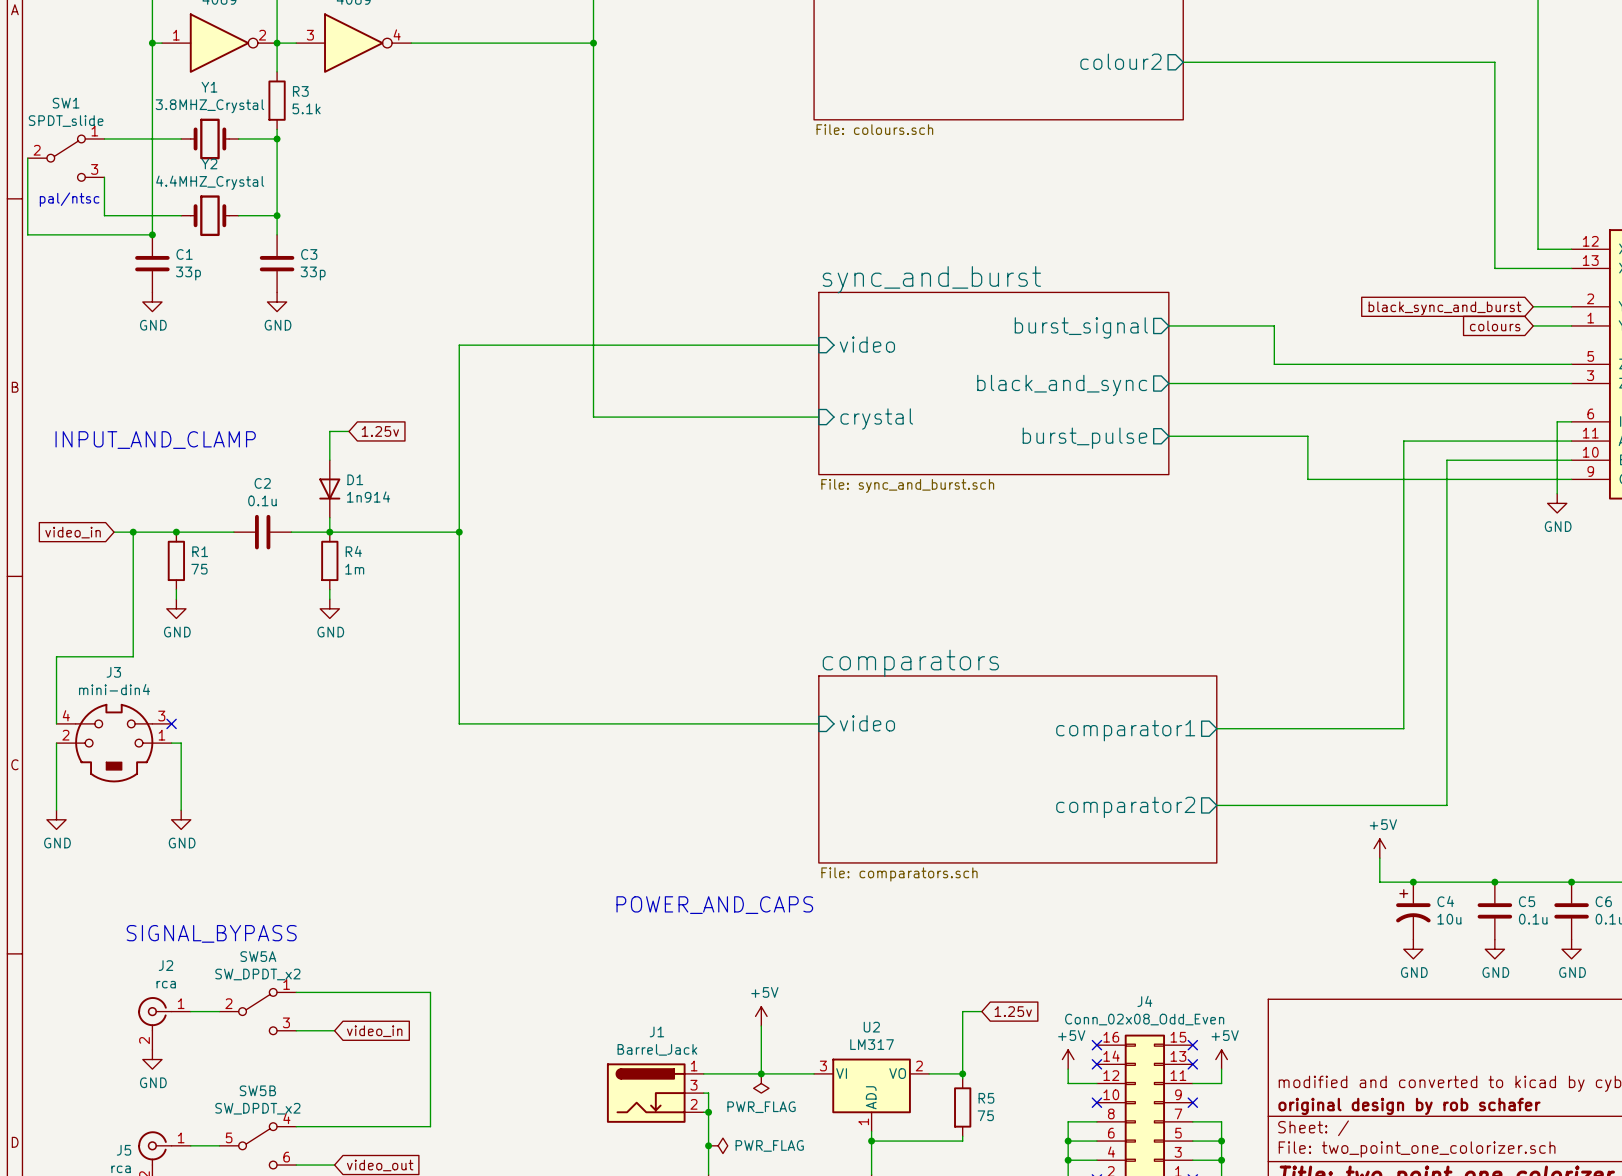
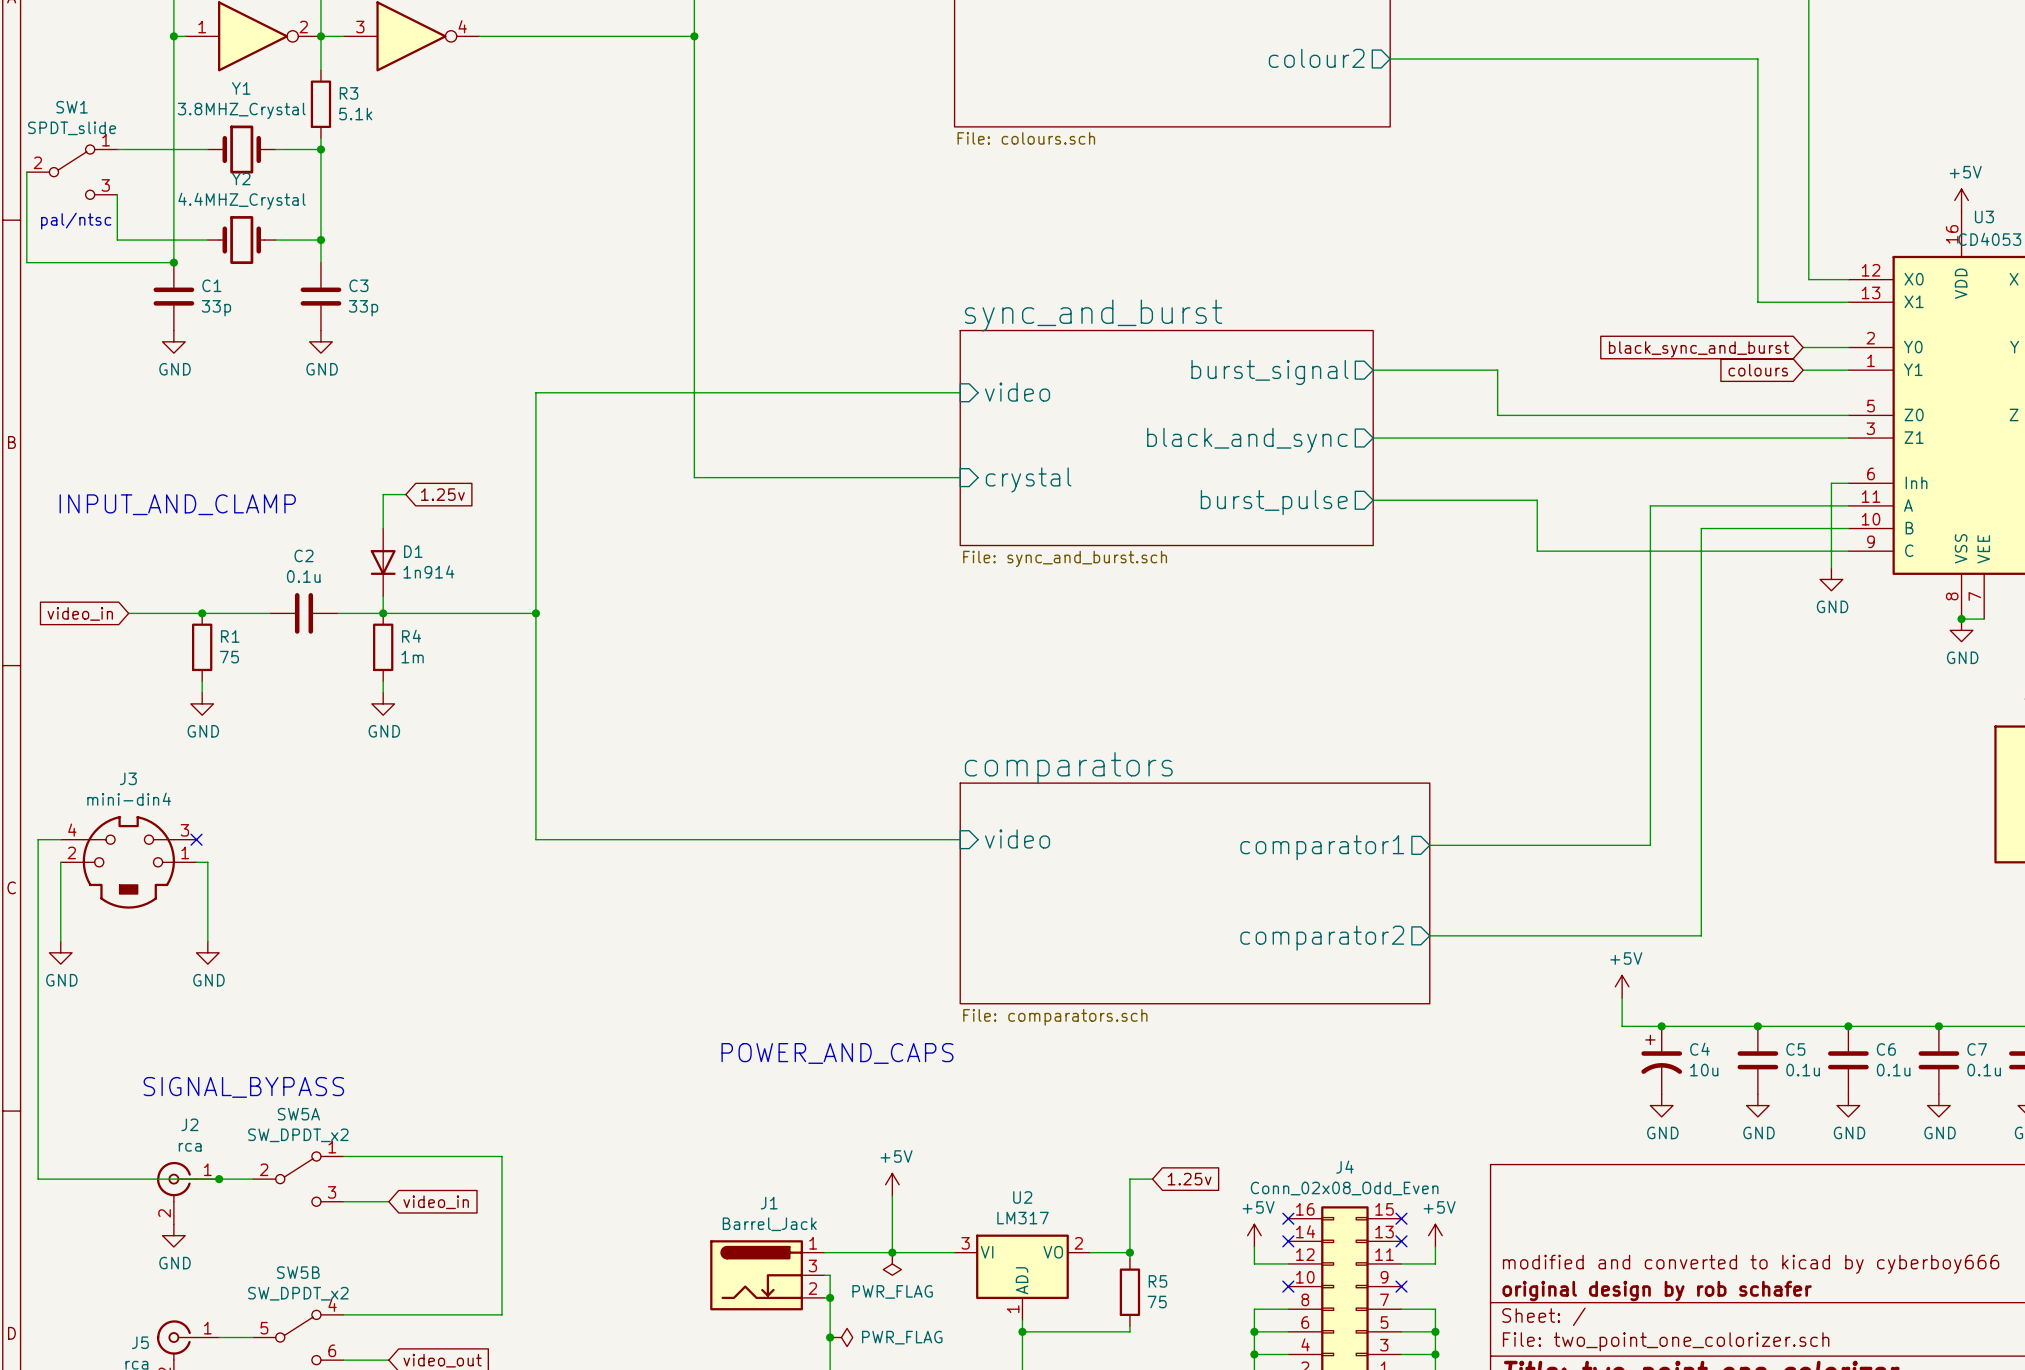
wire: (133, 532) (133, 656) (56, 656) (56, 723) -> (219, 1179) (38, 1179) (38, 839) (60, 839)
junction: (133, 532) -> none
junction: none -> (219, 1179)

